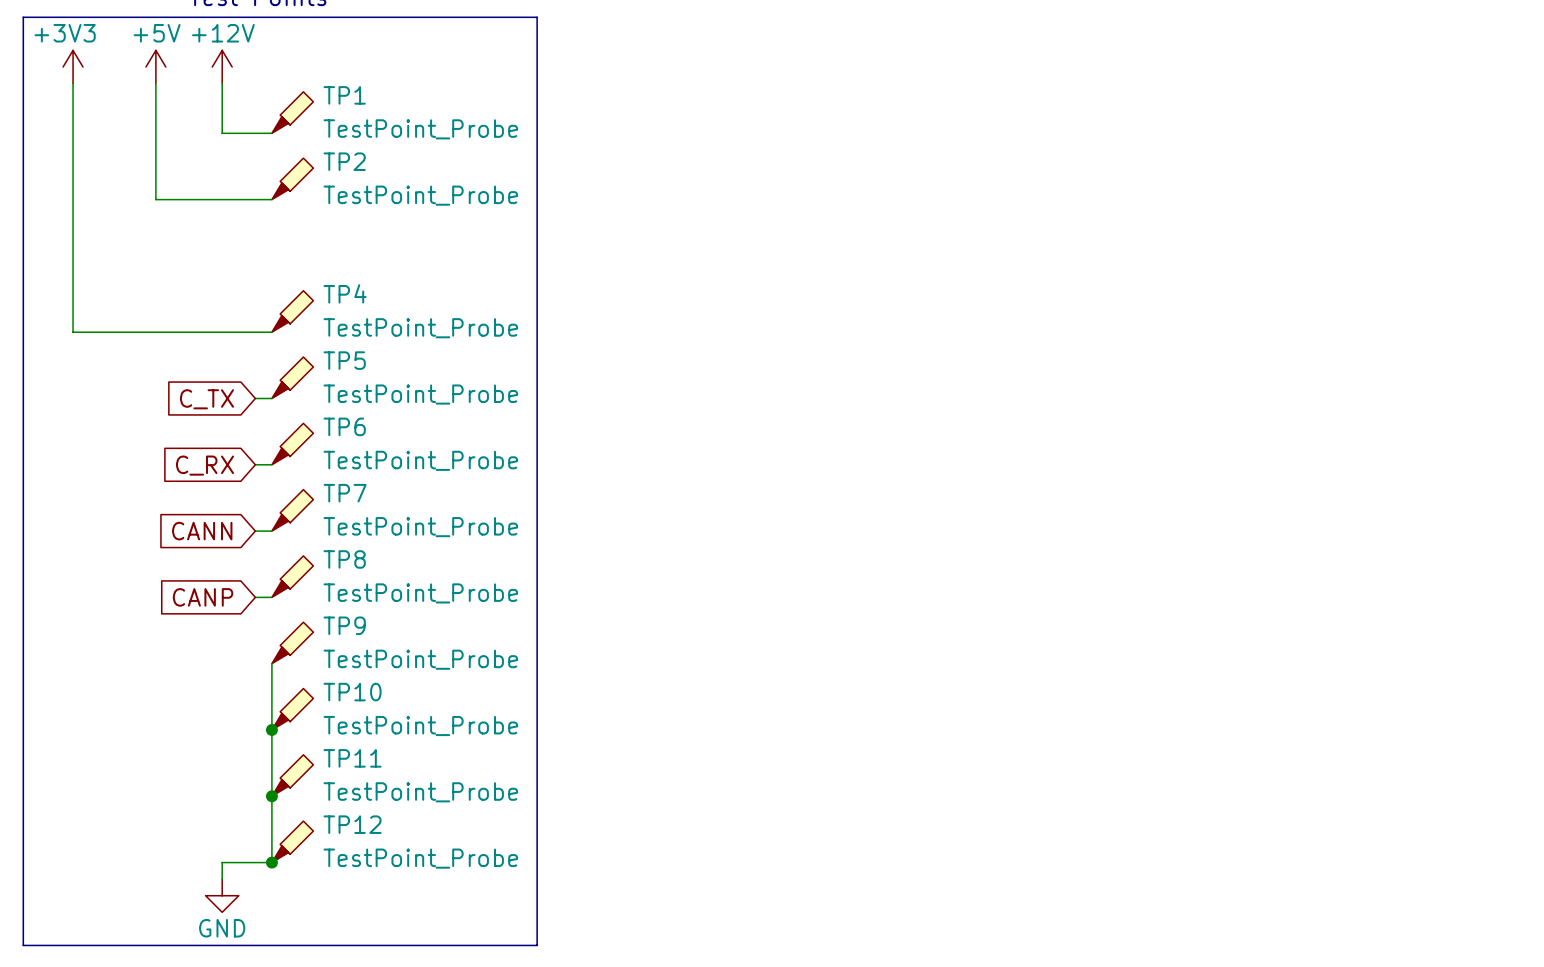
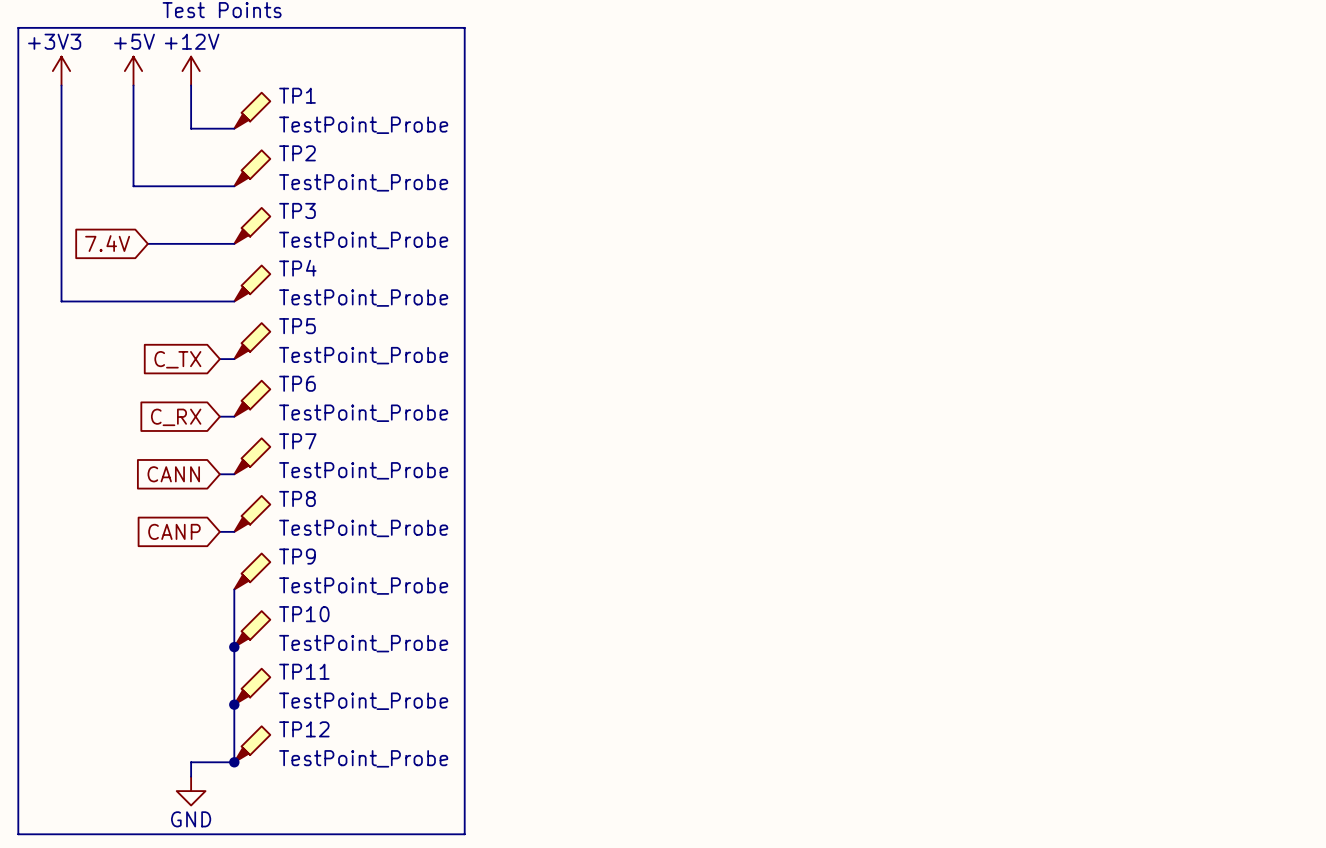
TP3: none -> TestPoint_Probe (252, 225)
global label: none -> 7.4V (107, 243)
wire: none -> (147, 243) (234, 243)

